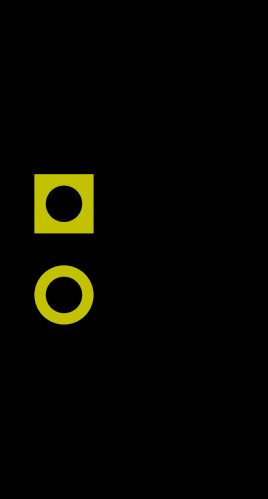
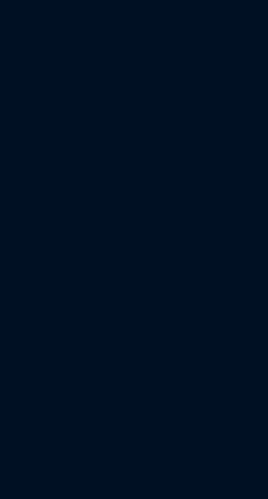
part: (63, 249) -> none

